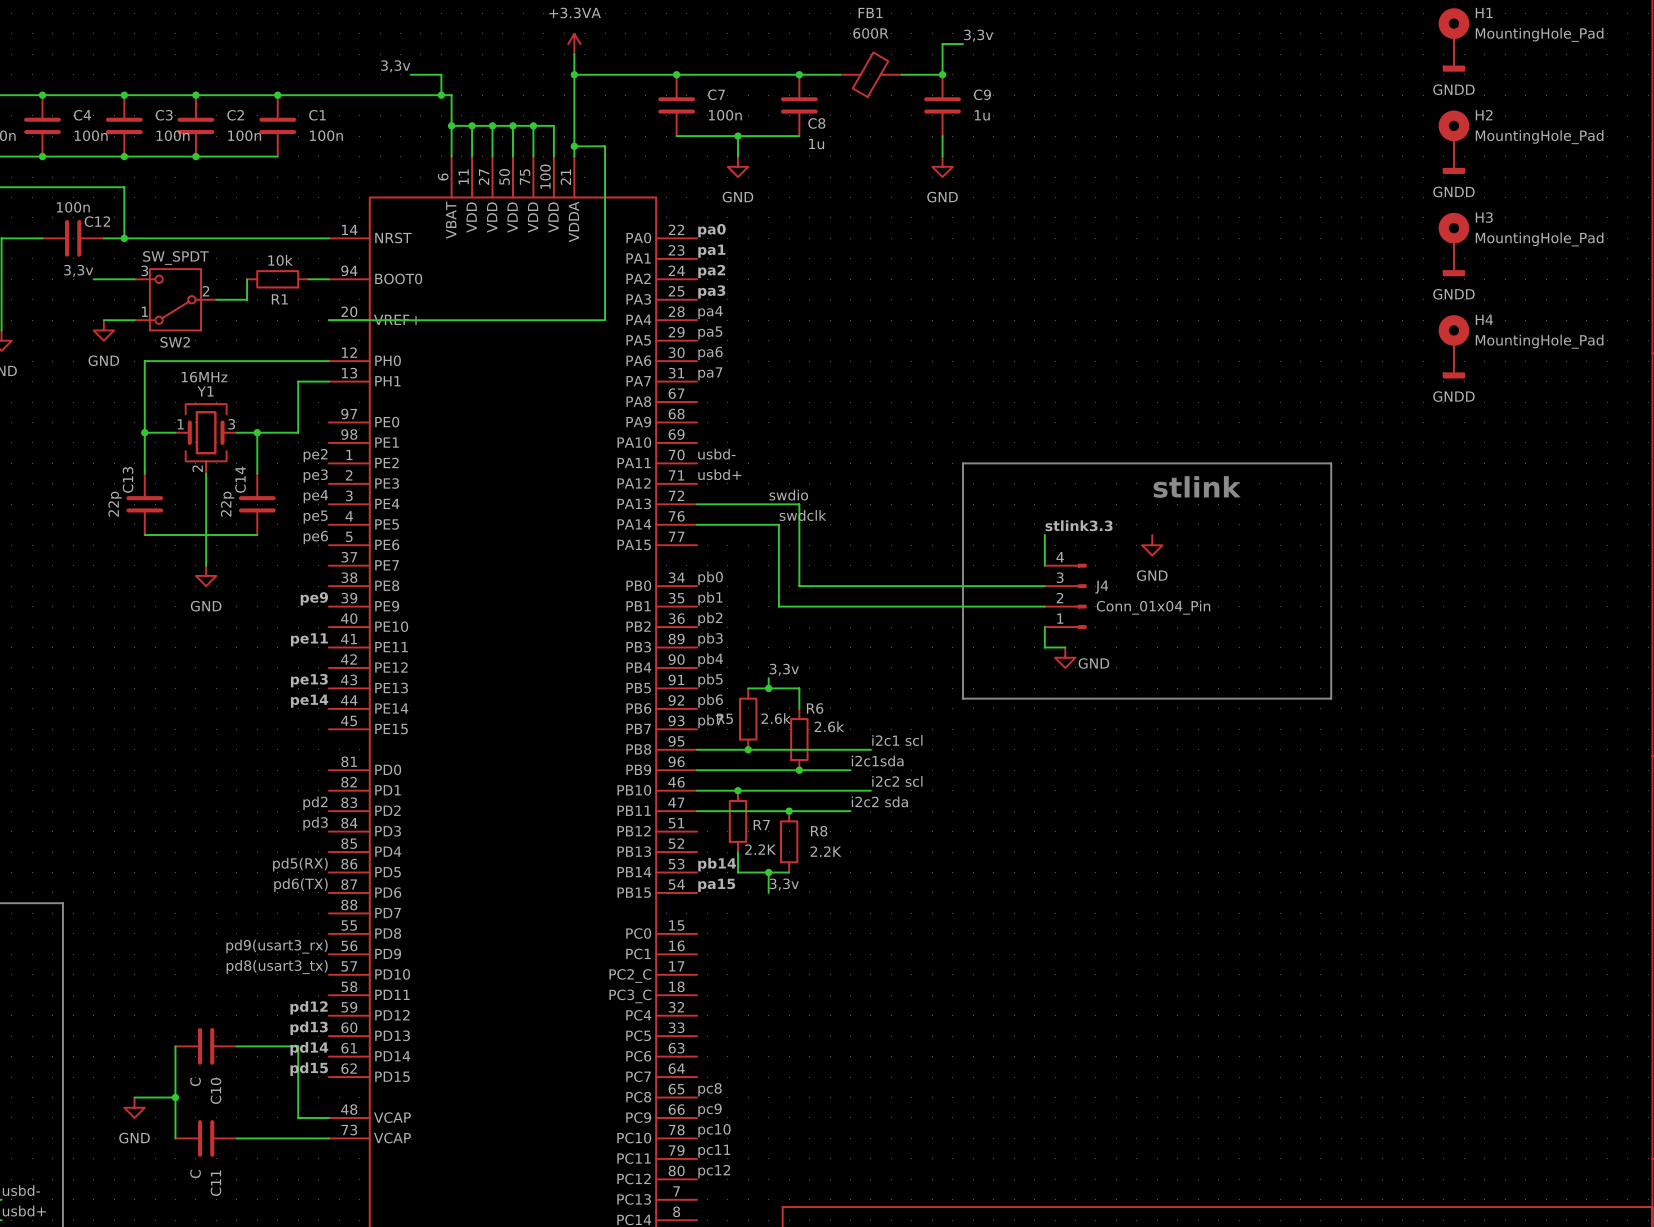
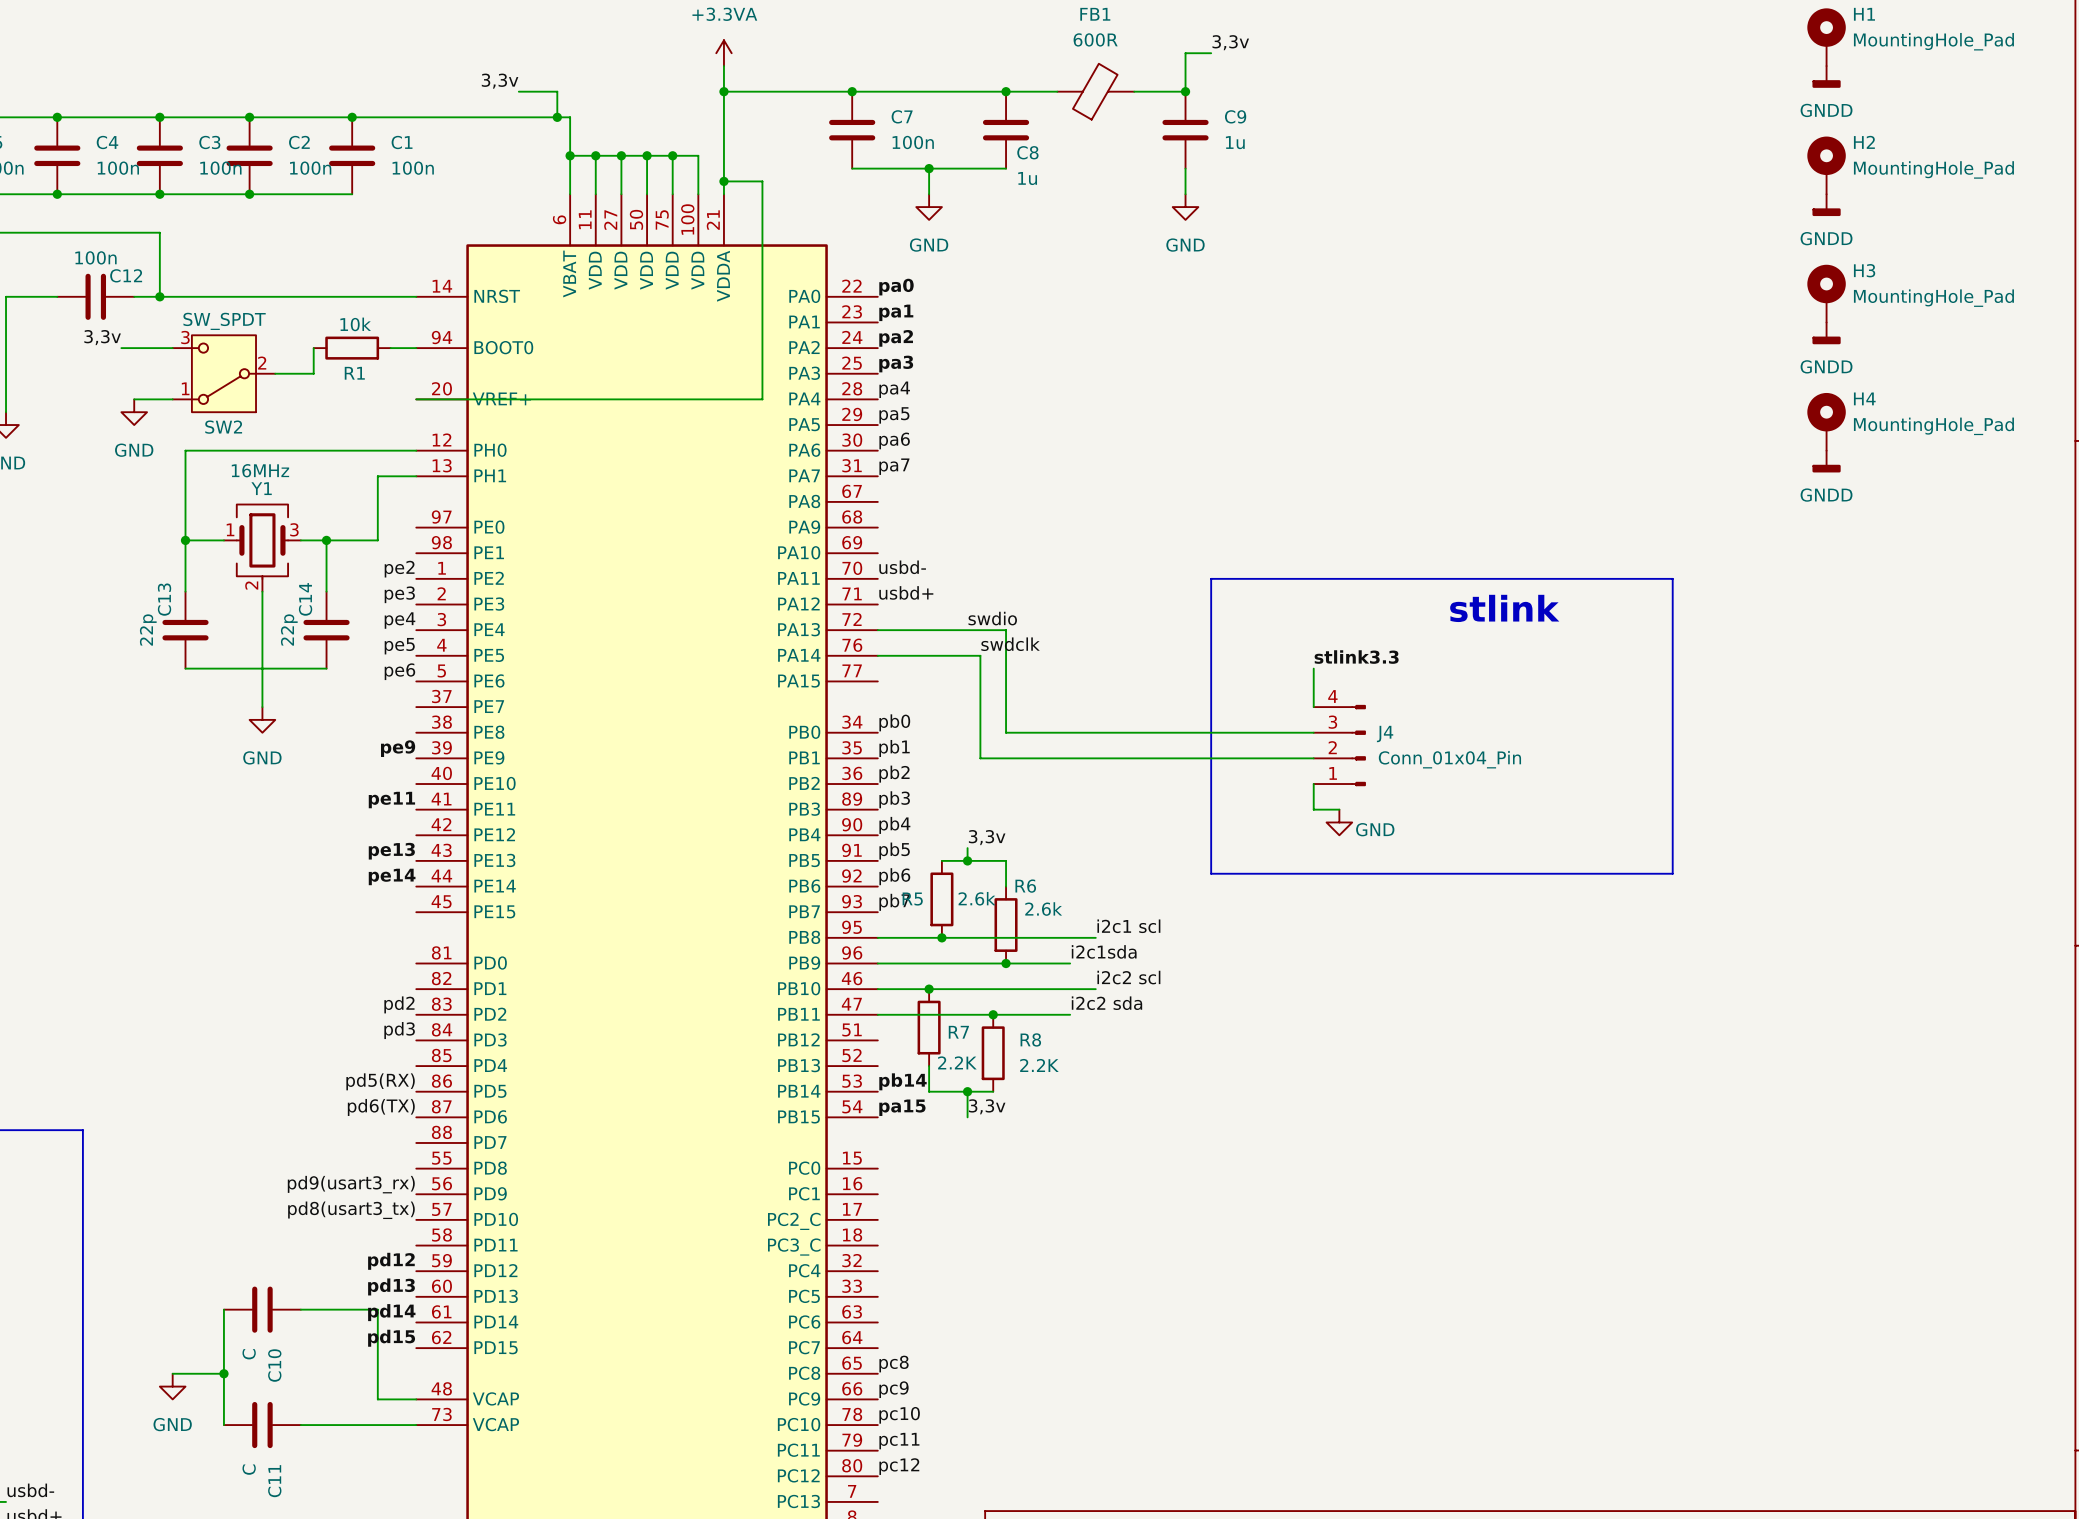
power symbol: GND (1152, 545) -> none

